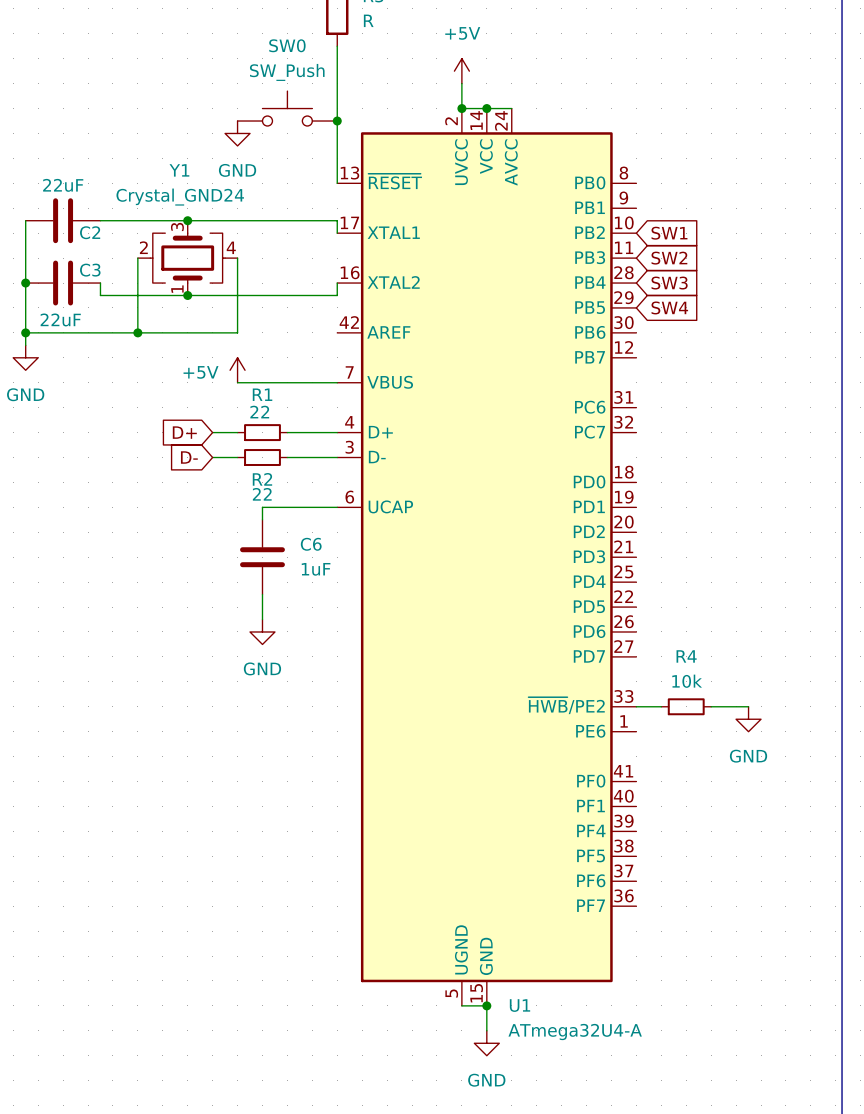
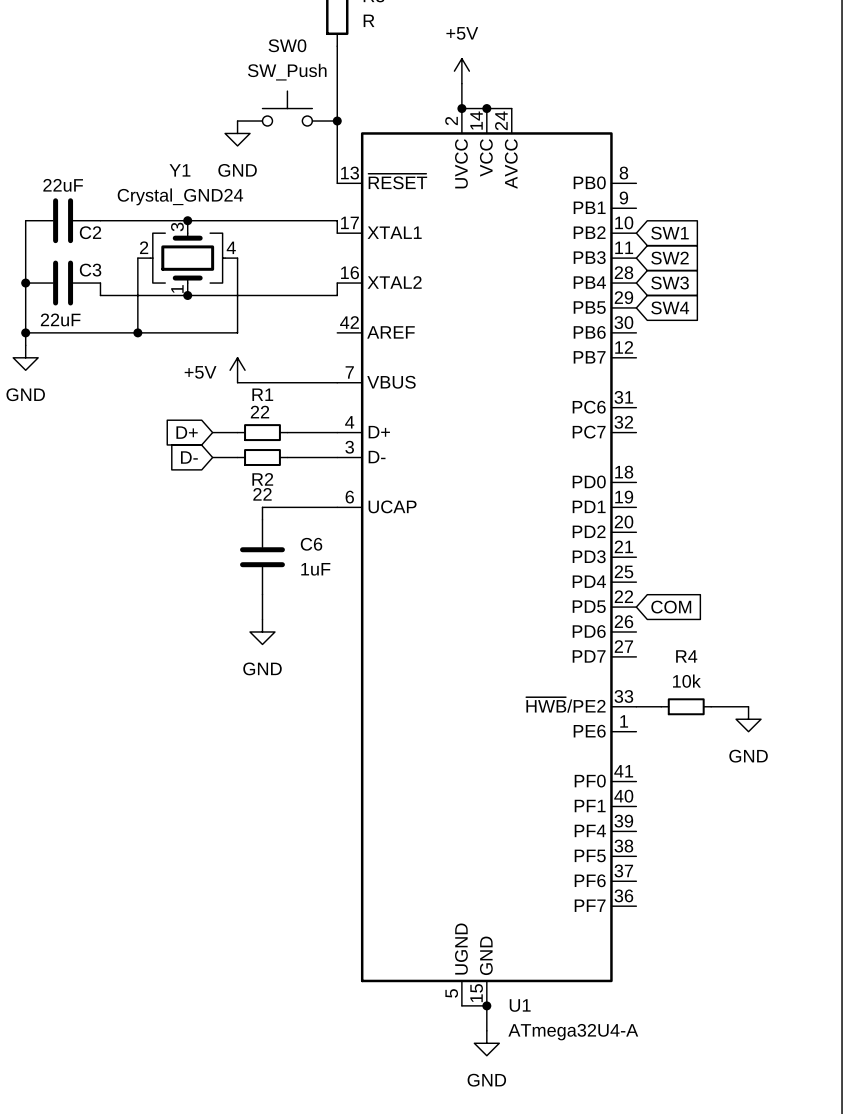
global label: none -> COM (671, 607)

